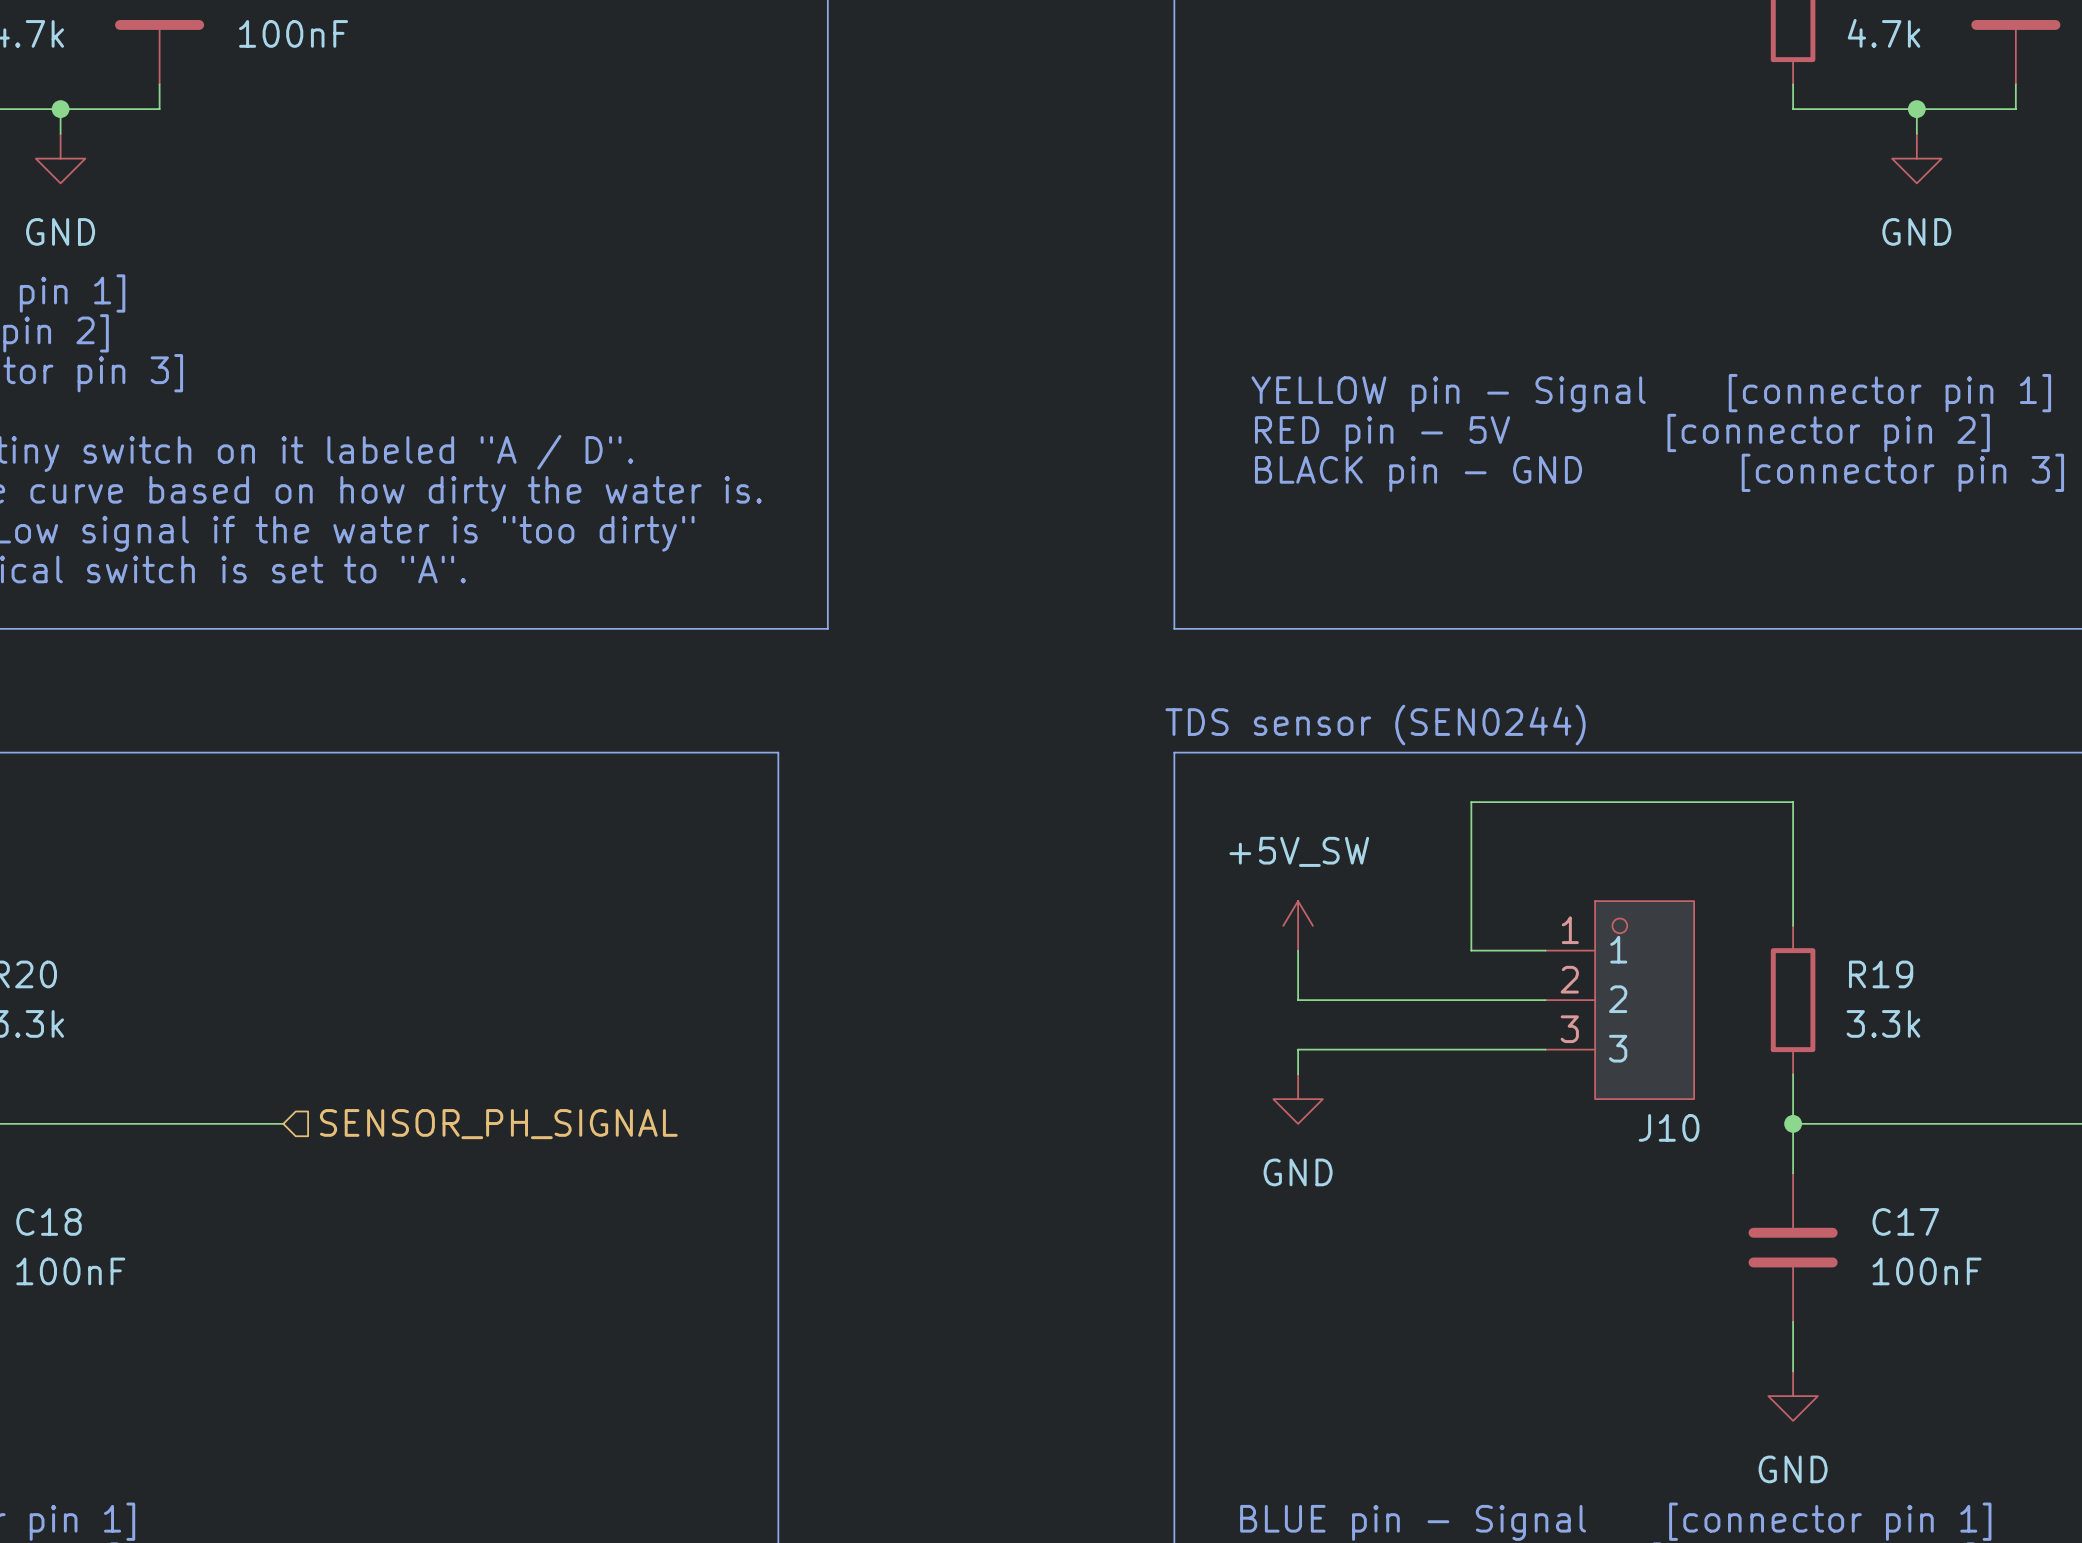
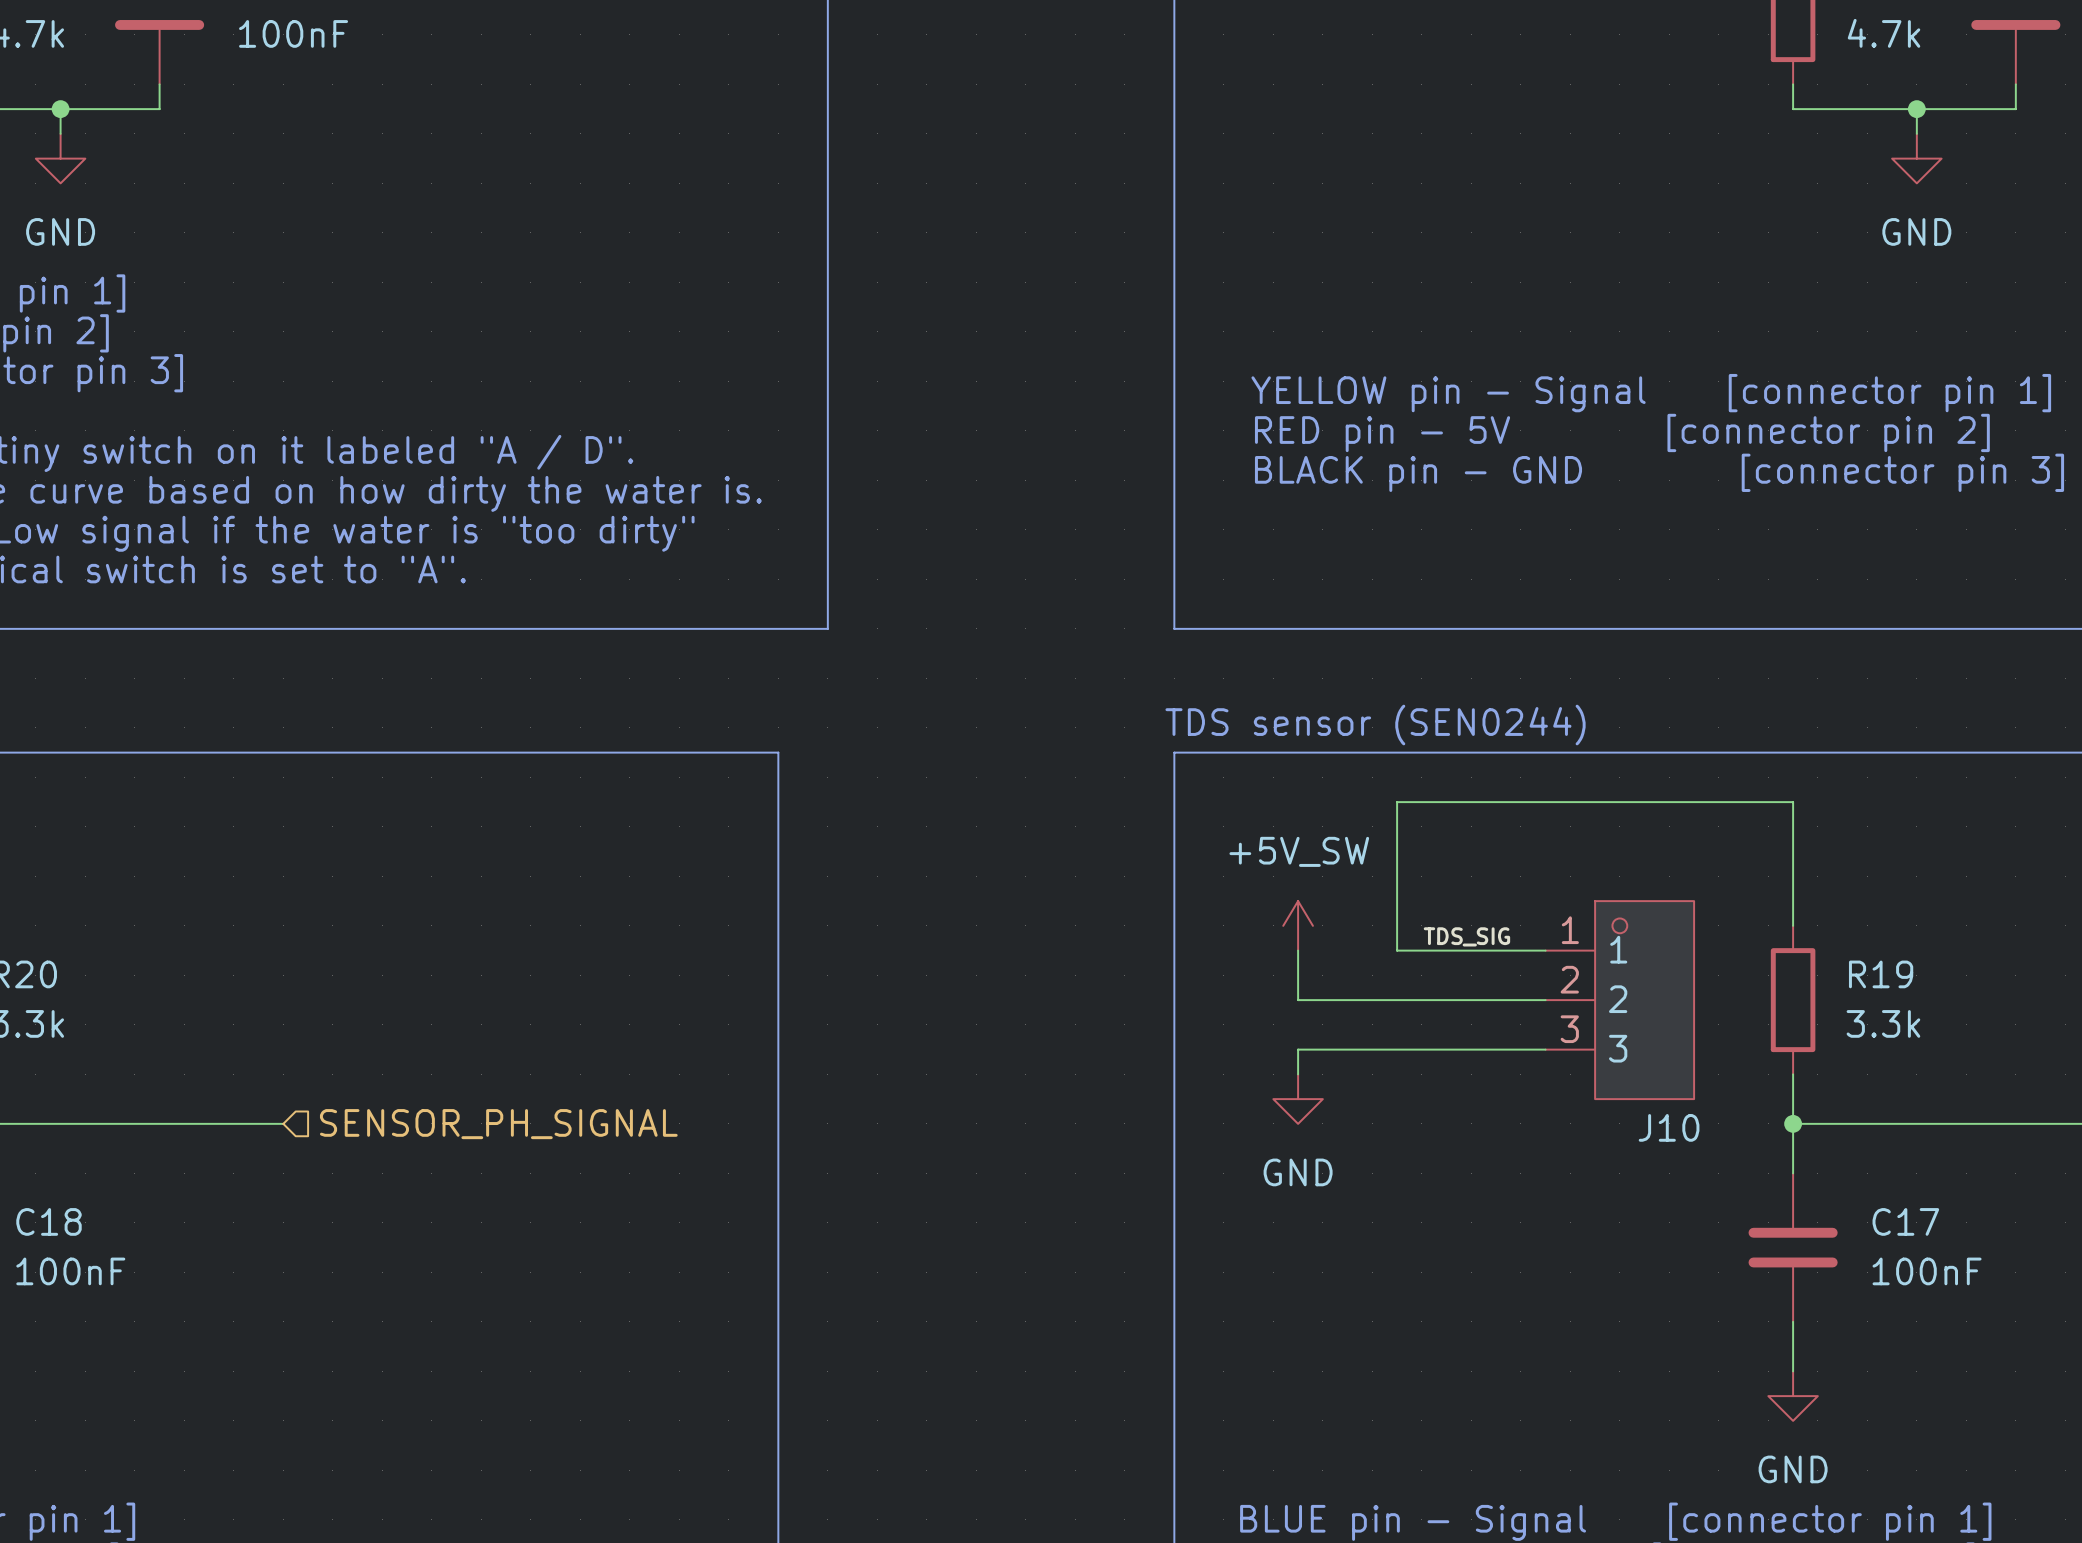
wire: (1471, 802) (1471, 950) -> (1471, 802) (1397, 802) (1397, 950) (1471, 950)
label: none -> TDS_SIG (1466, 936)

